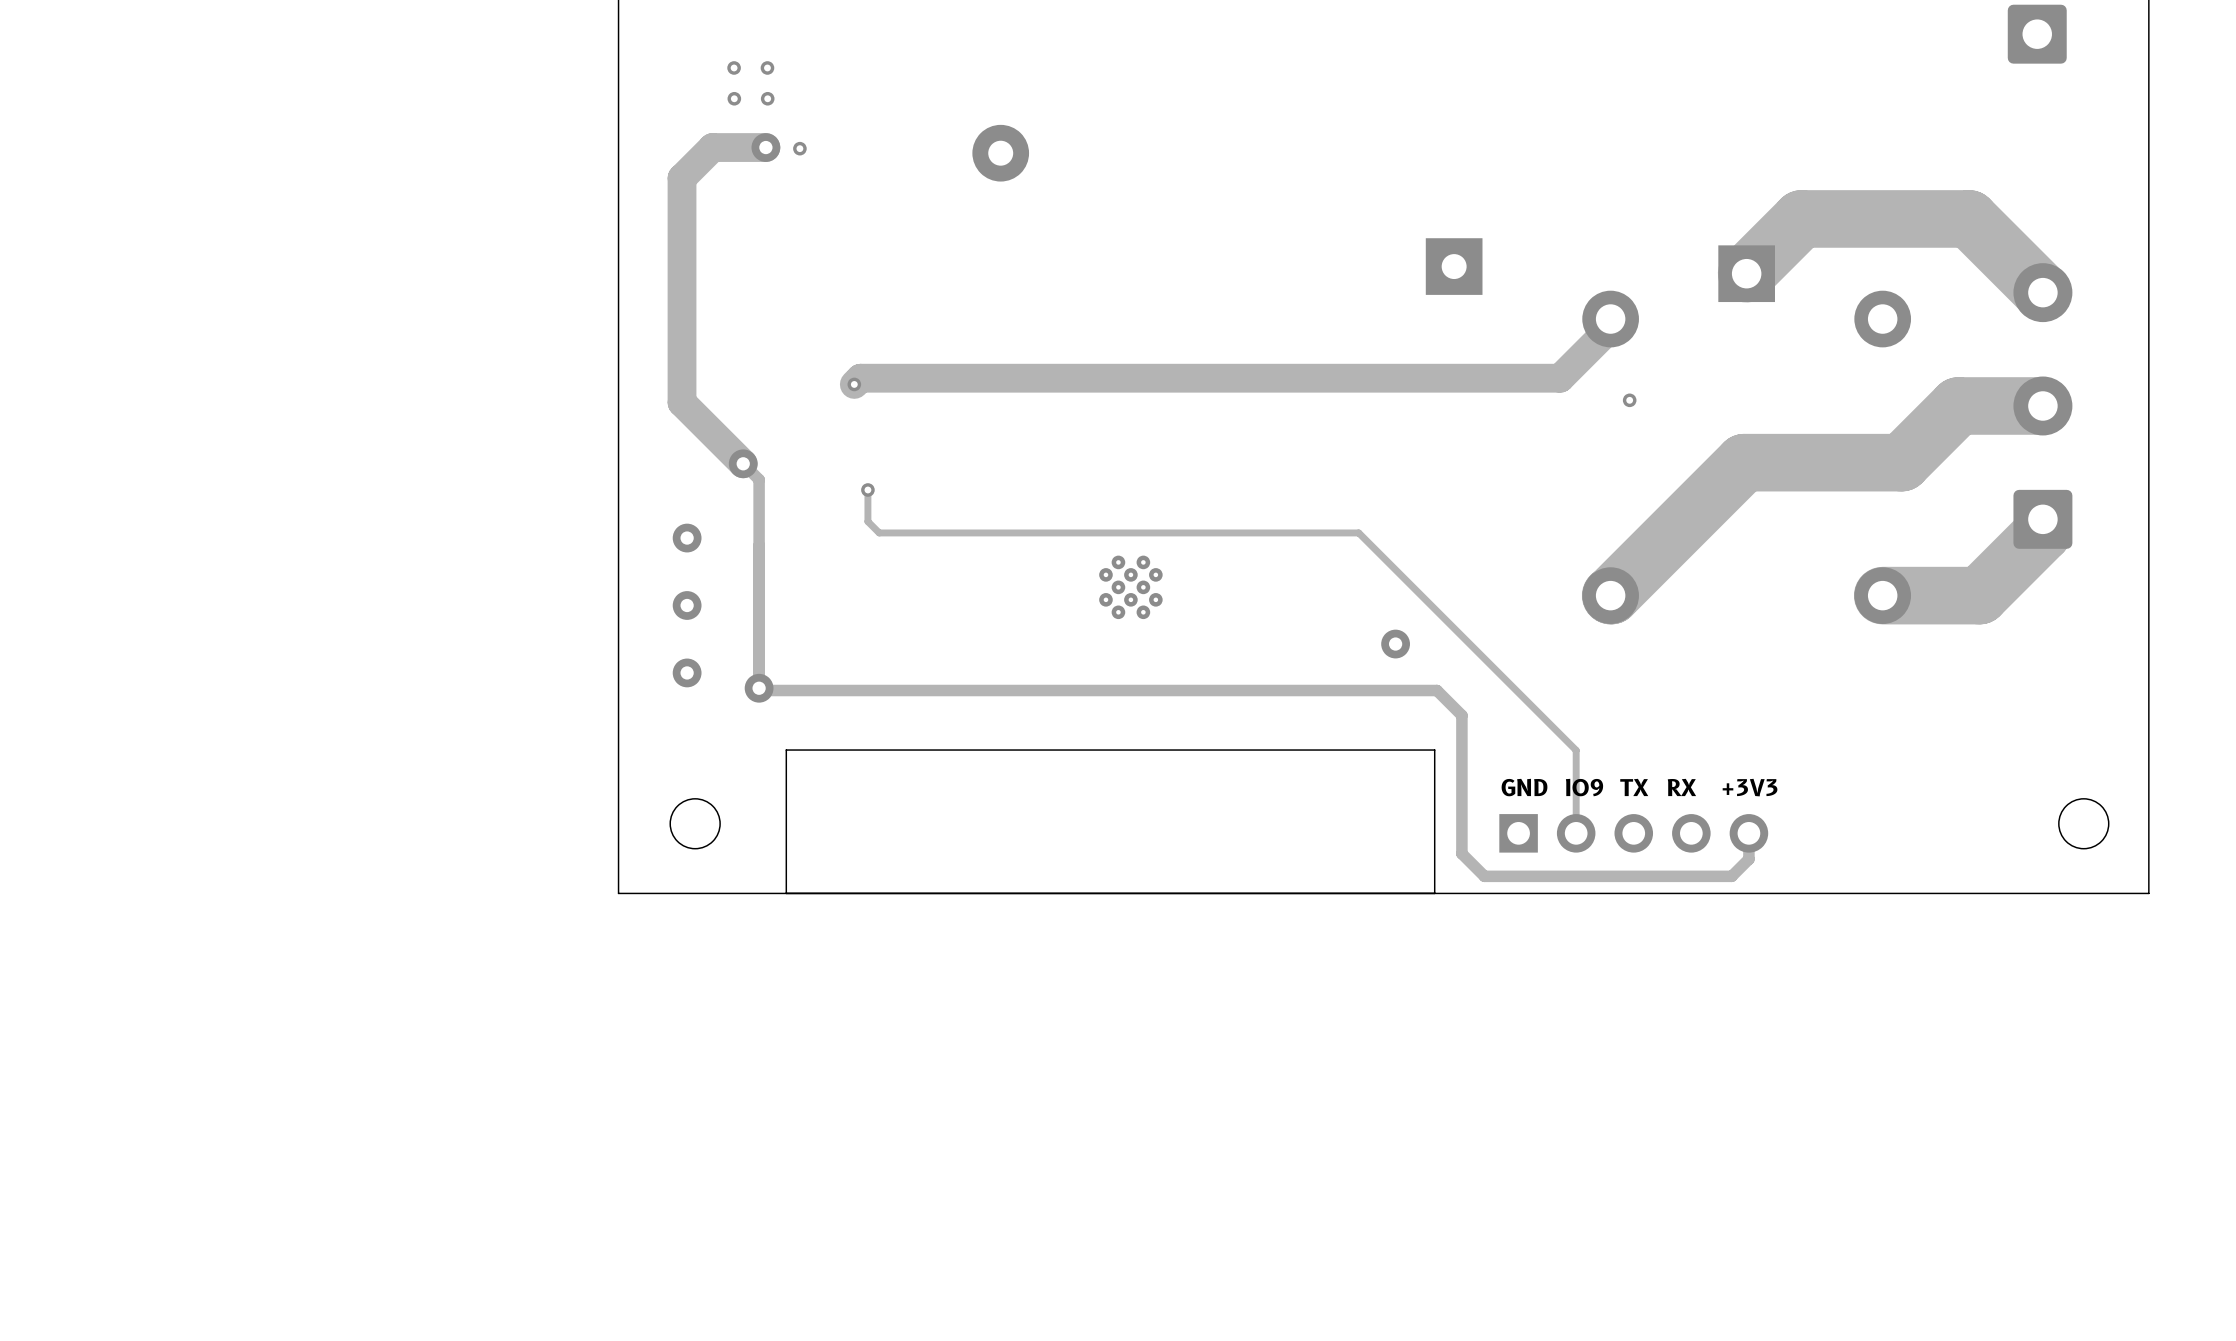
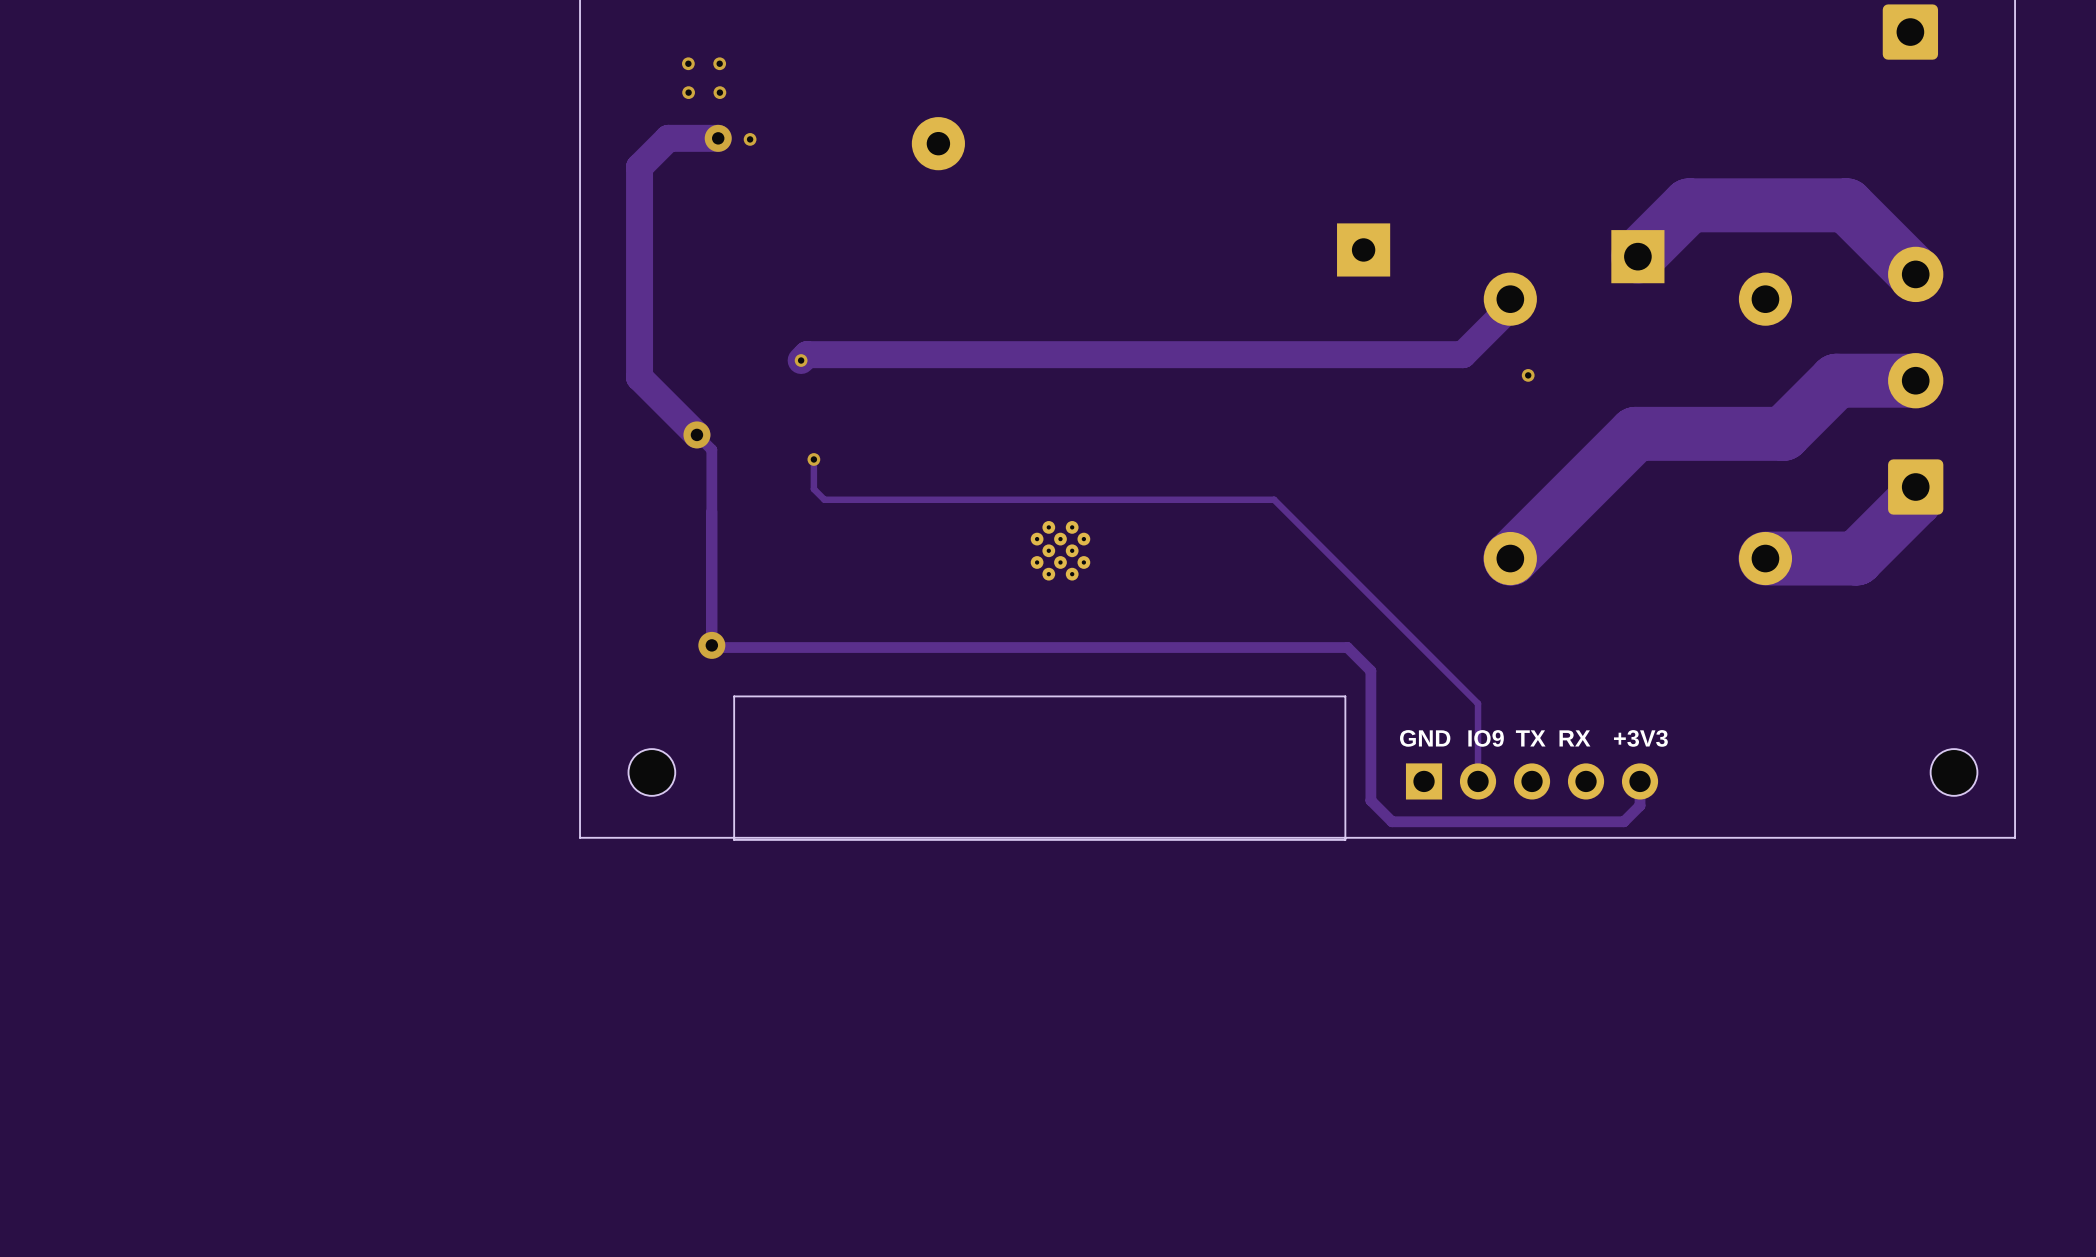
via: (687, 538) -> none
via: (687, 605) -> none
via: (1395, 644) -> none
via: (687, 672) -> none
board edge: (1434, 750) (786, 750) (786, 893) -> (1345, 703) (1345, 696) (734, 696) (734, 839) (1345, 839) (1345, 837)

